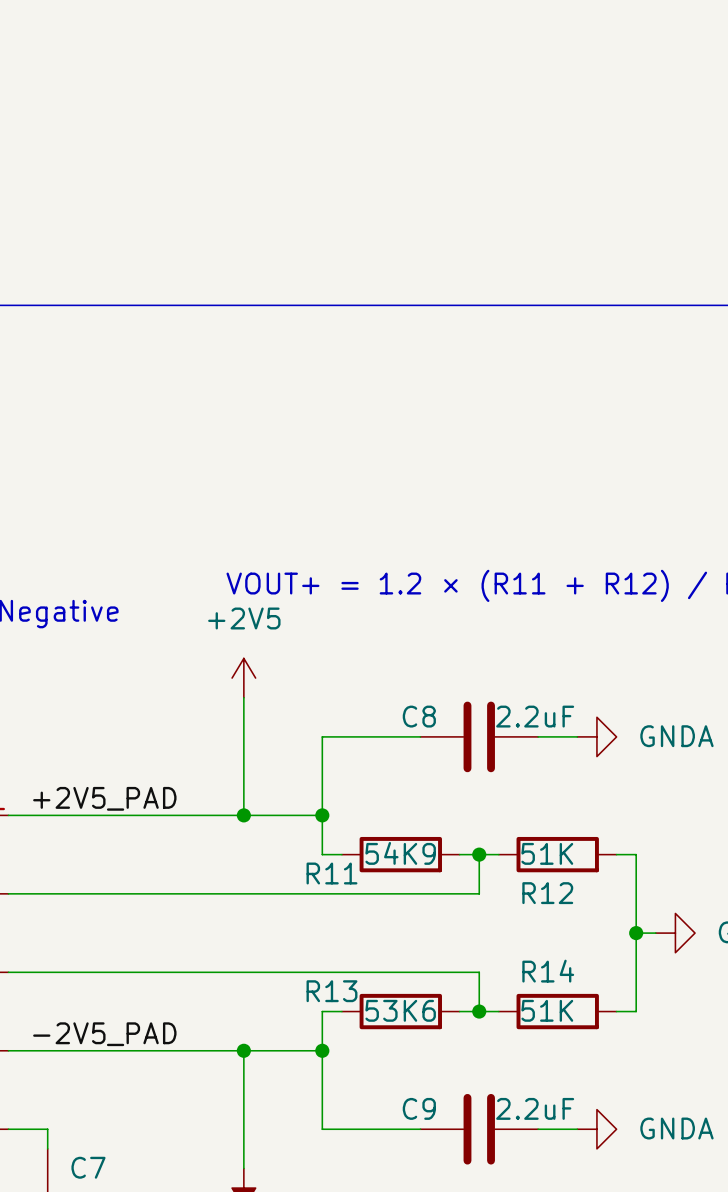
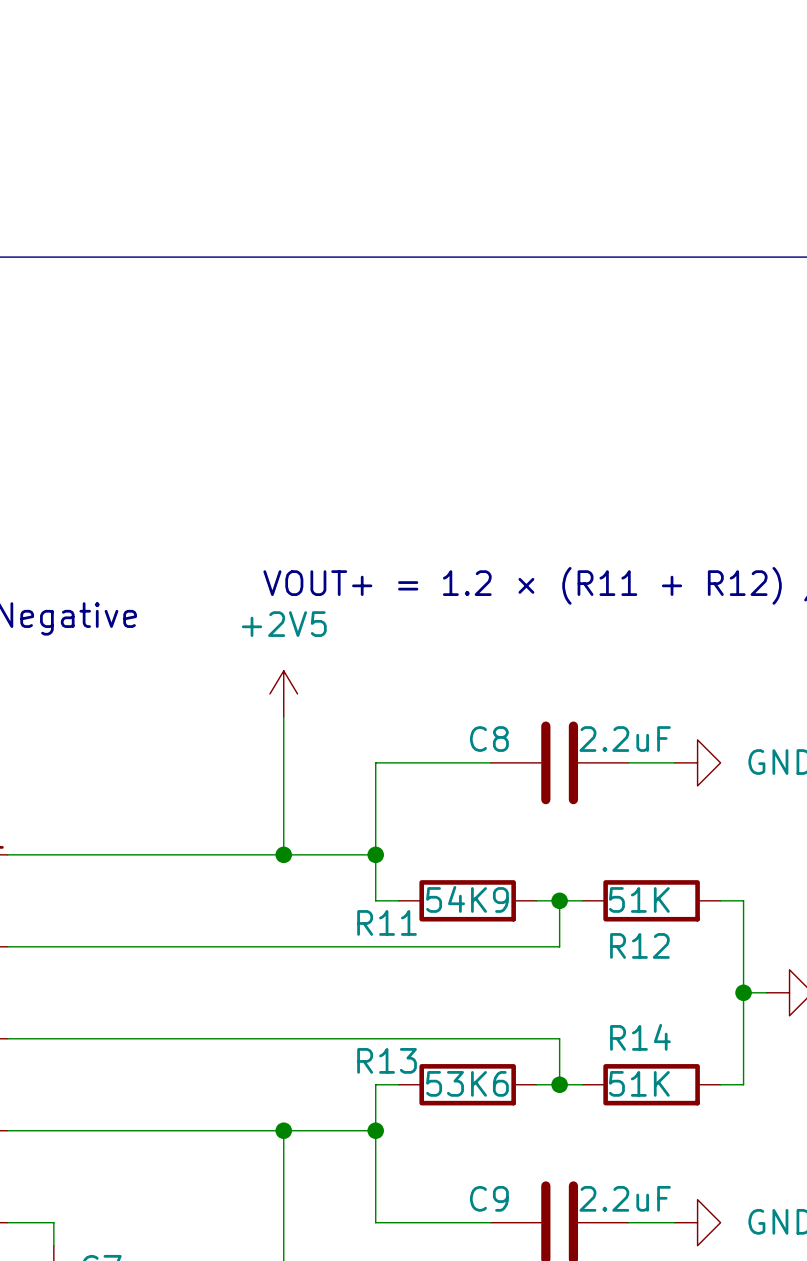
label: +2V5_PAD (104, 798) -> none
label: -2V5_PAD (104, 1034) -> none

